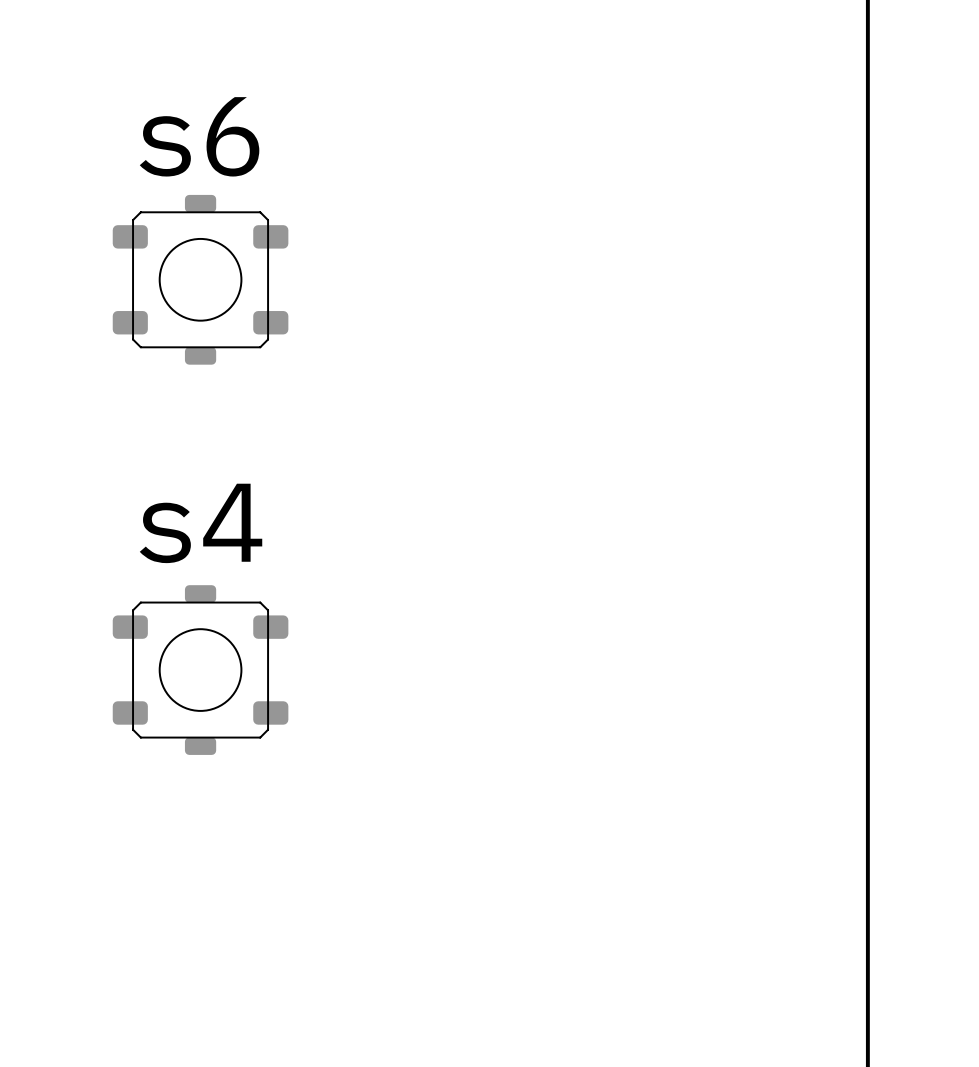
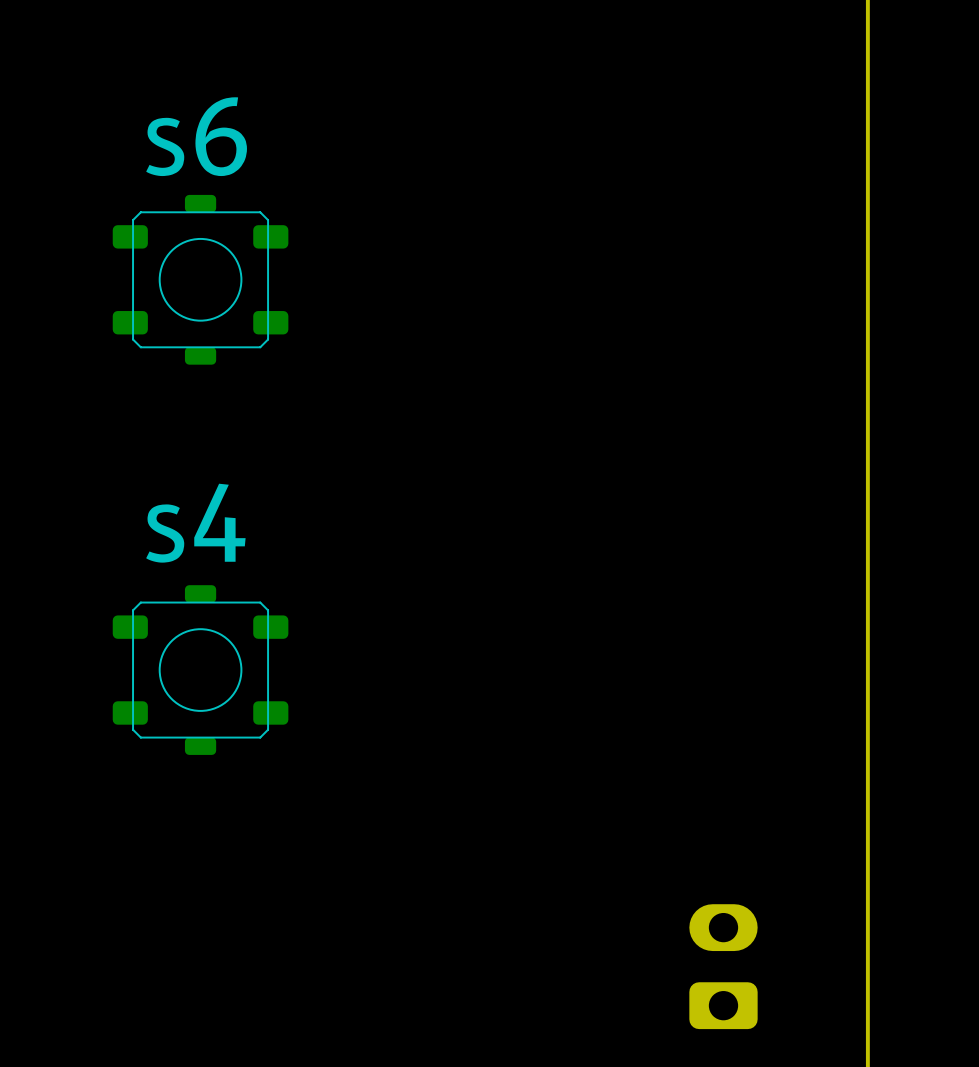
part: none -> (723, 966)

